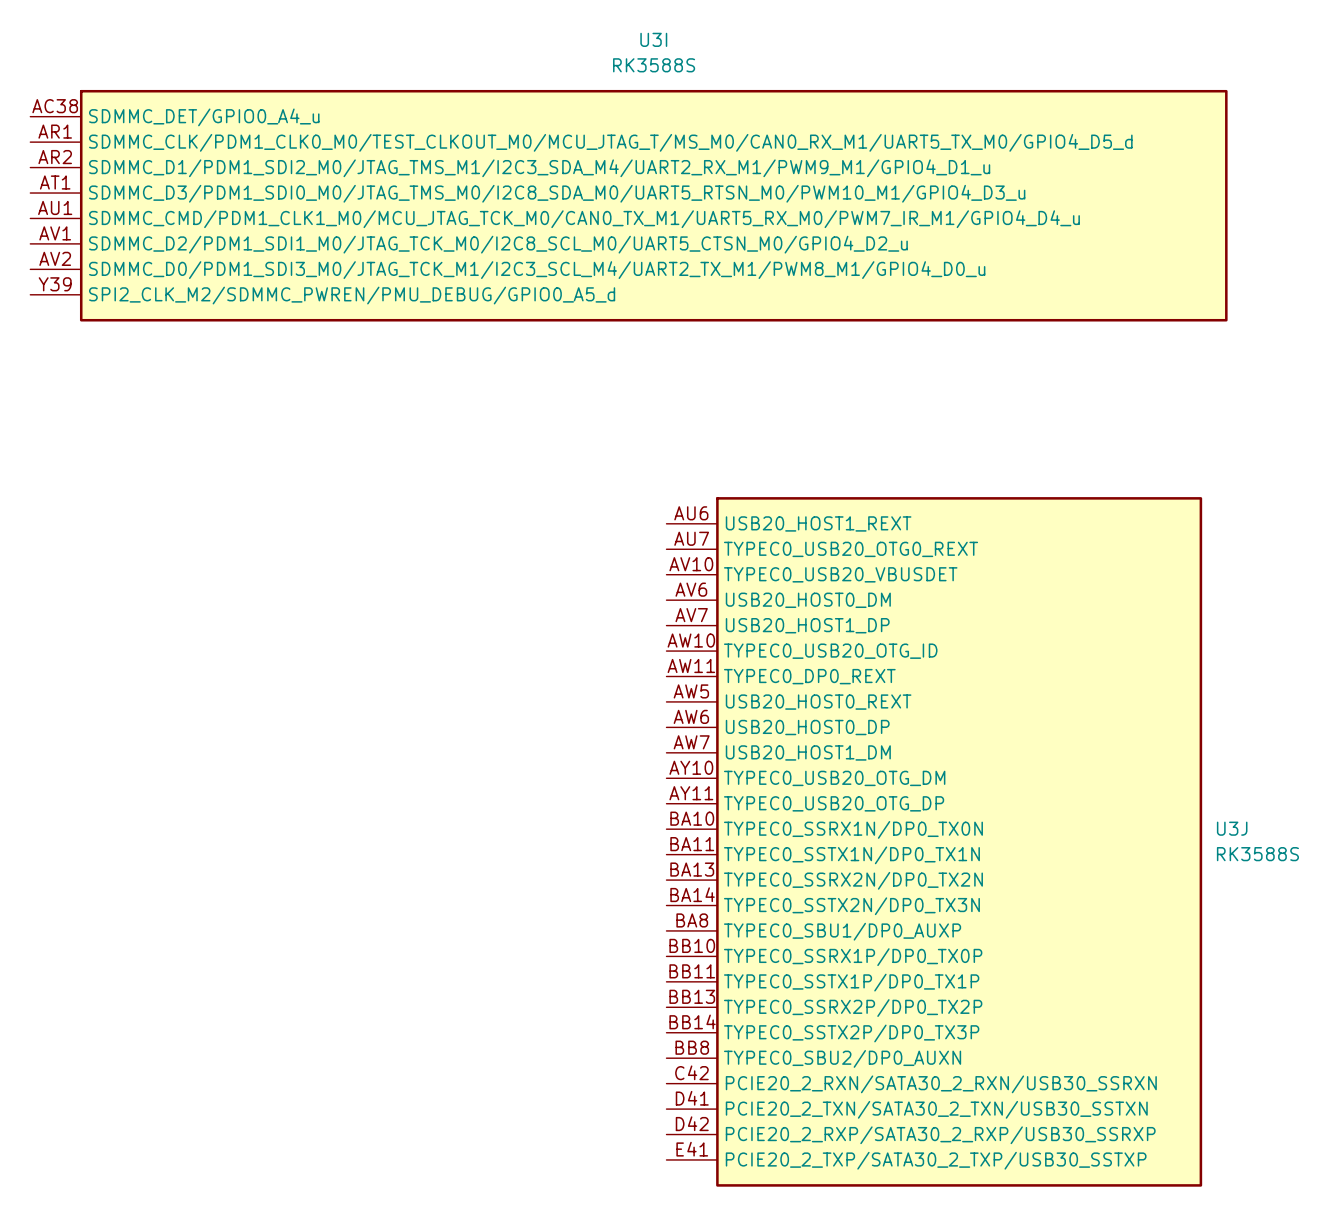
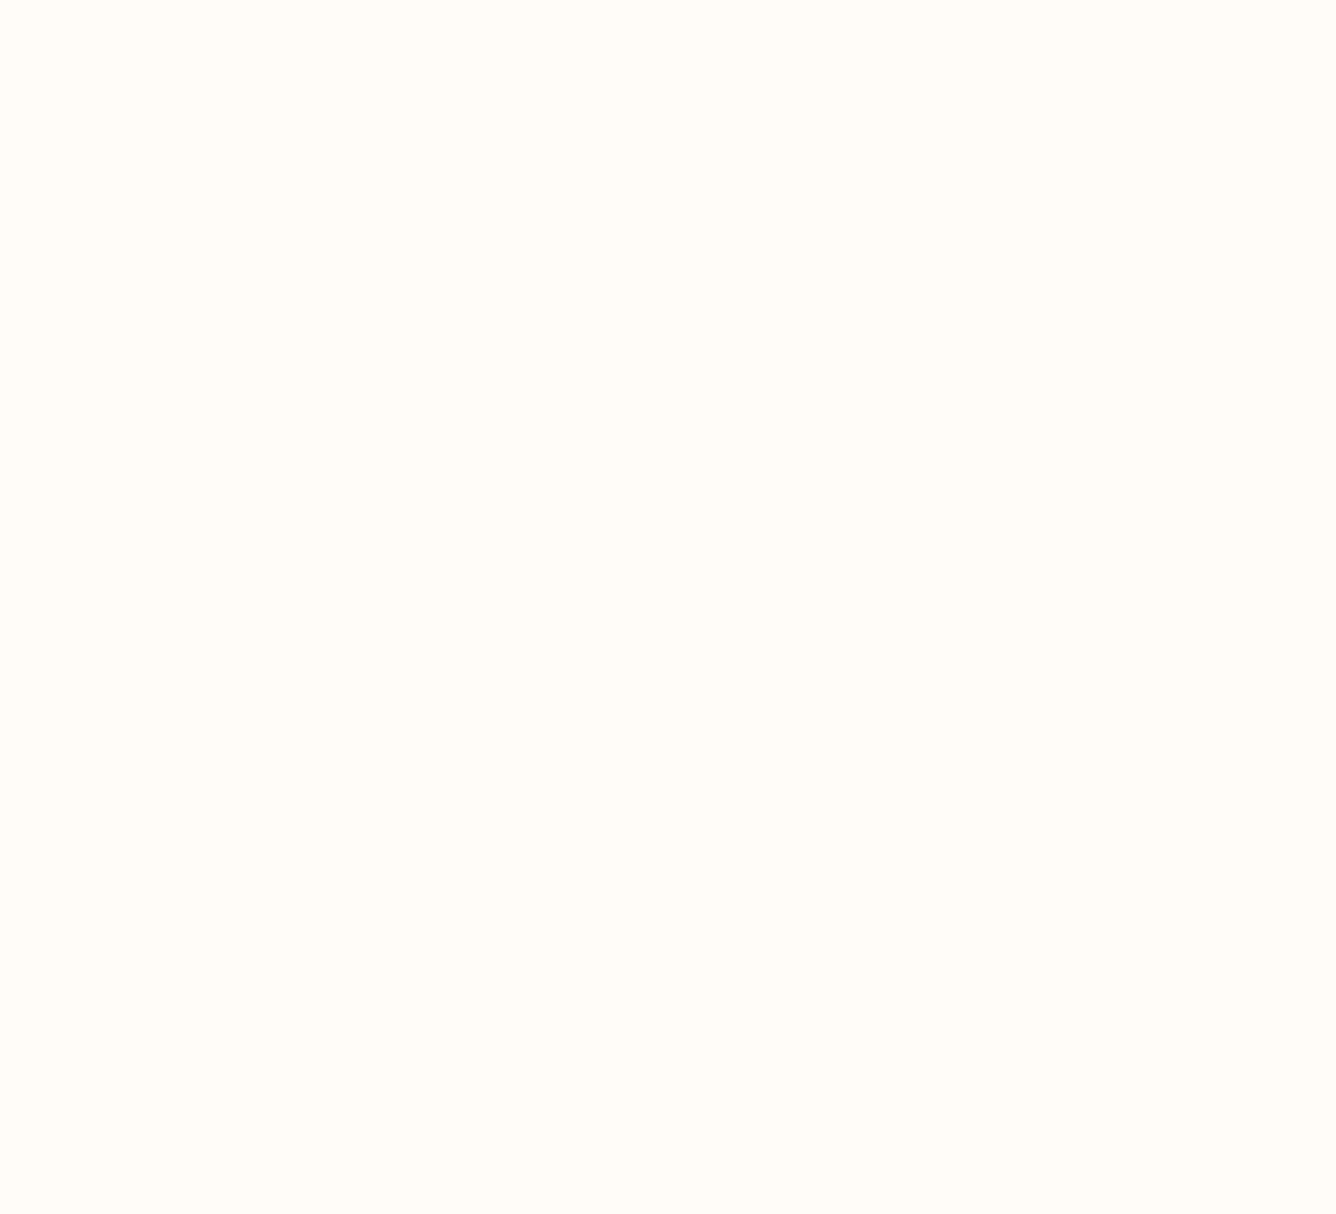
U3I: RK3588S (628, 205) -> none
U3J: RK3588S (934, 841) -> none

